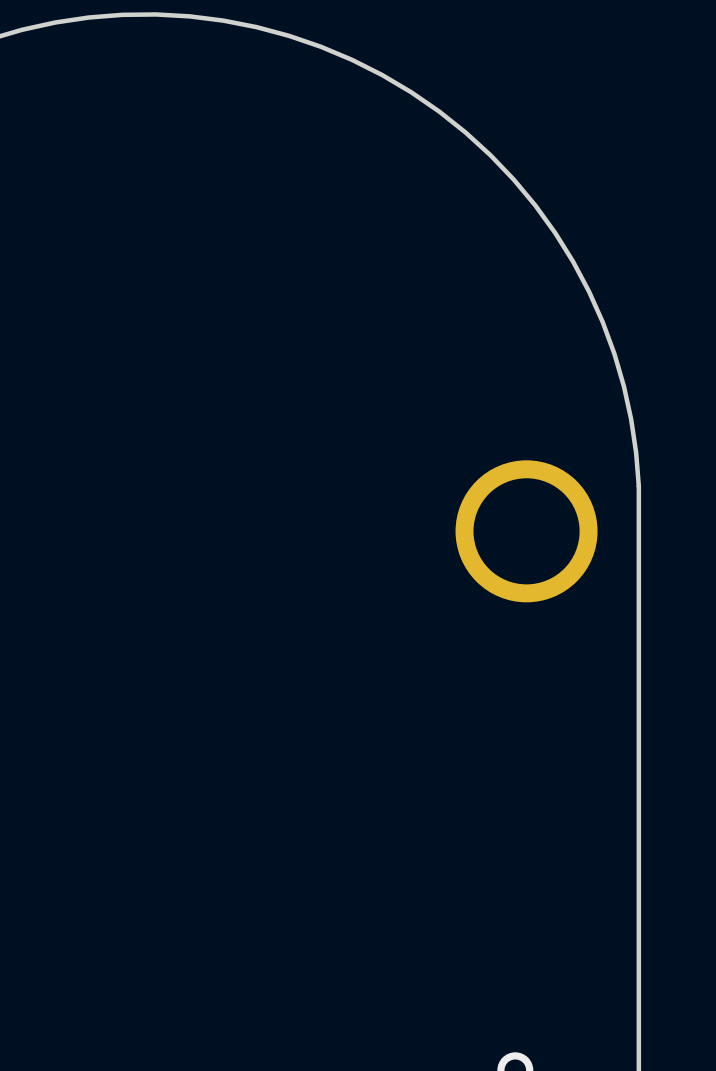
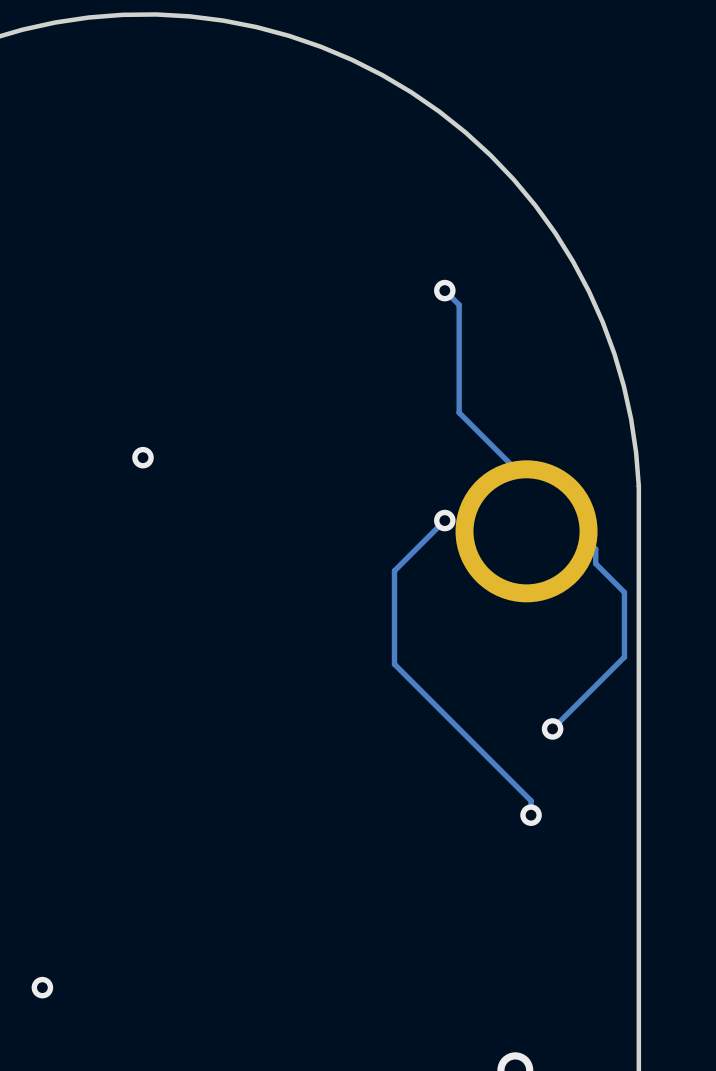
track: none -> (444, 290) (459, 304) (459, 412) (595, 549) (595, 563) (624, 592) (624, 657) (552, 728)
via: none -> (444, 290)
via: none -> (143, 457)
track: none -> (444, 520) (394, 570) (394, 664) (531, 800) (531, 815)
via: none -> (444, 520)
via: none -> (552, 728)
via: none -> (531, 815)
via: none -> (42, 987)

